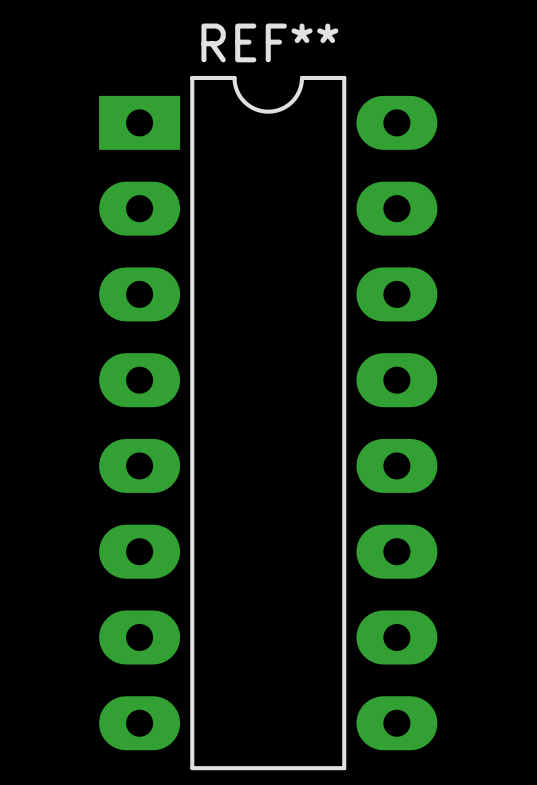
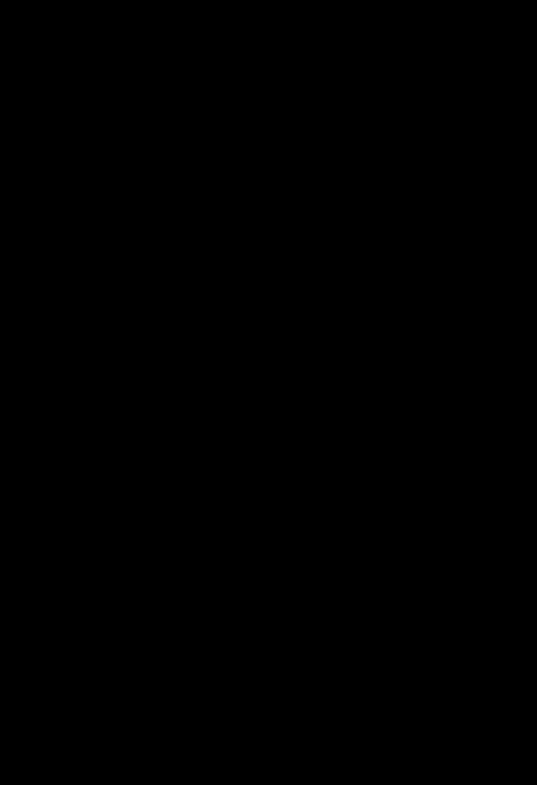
REF**: (268, 423) -> none

